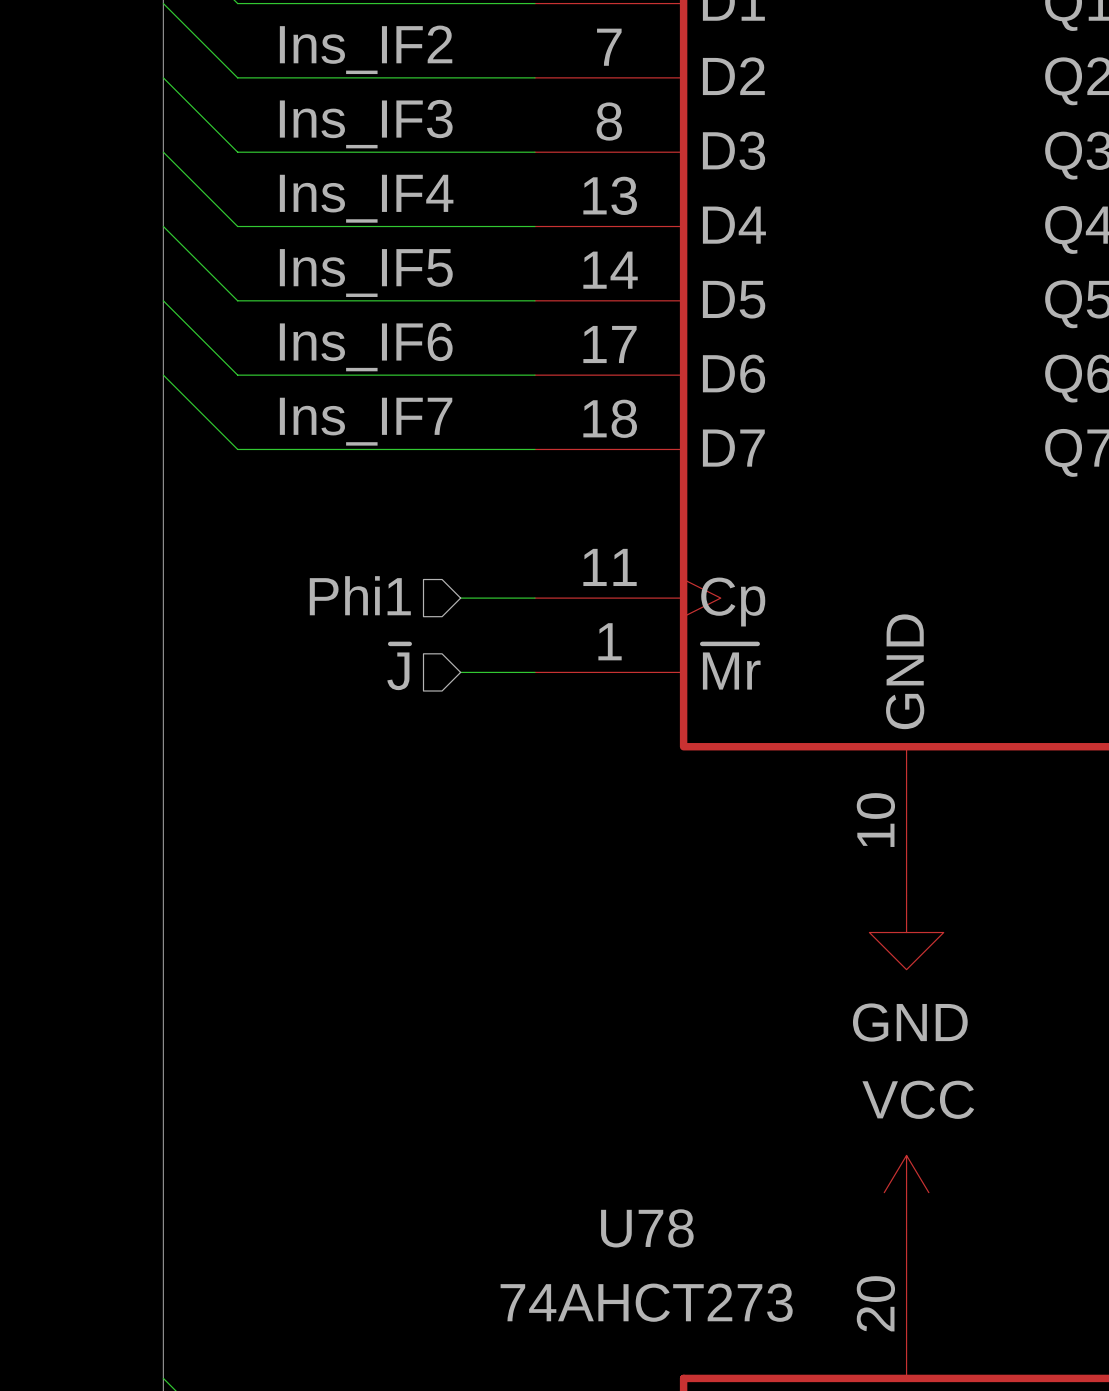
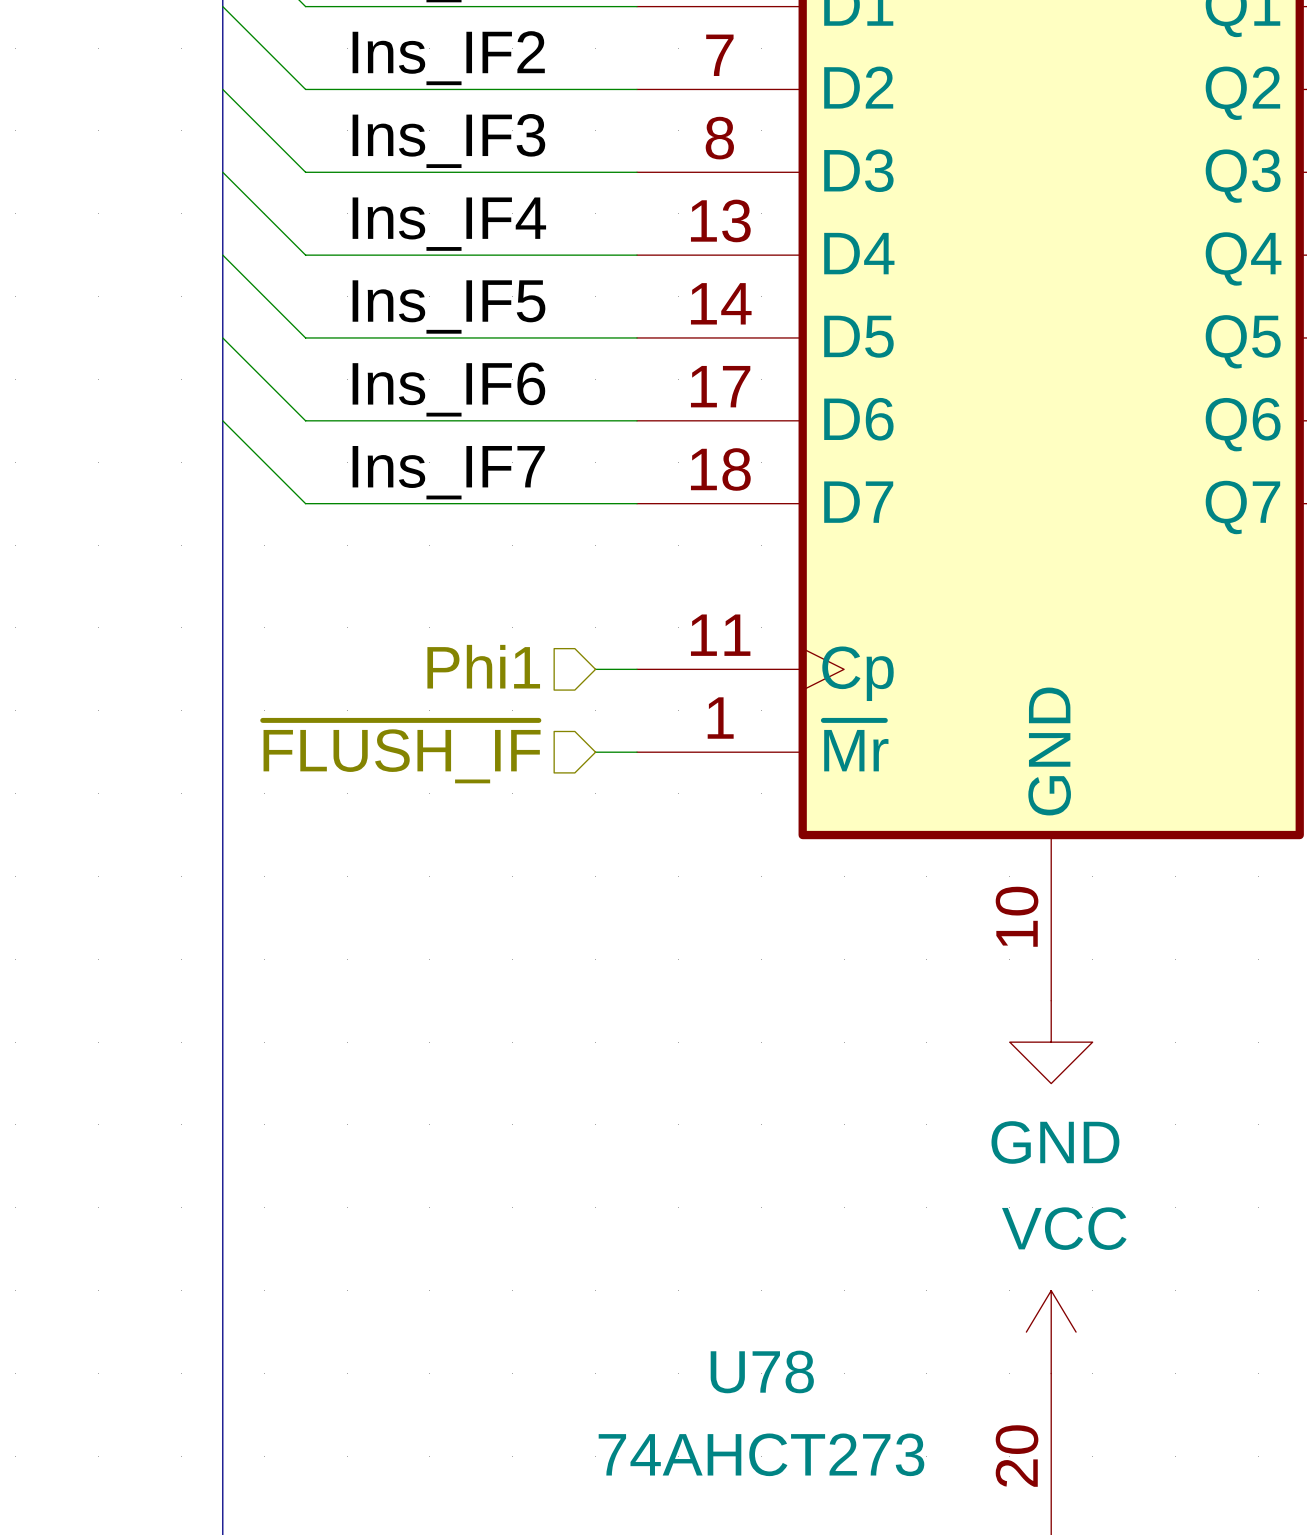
hierarchical label position: Phi1 (360, 595) -> Phi1 (483, 666)
wire: (460, 598) (497, 598) -> none
hierarchical label: ~{J} (398, 667) -> none
hierarchical label: none -> ~{FLUSH_IF} (401, 751)
wire: (460, 672) (497, 672) -> none

